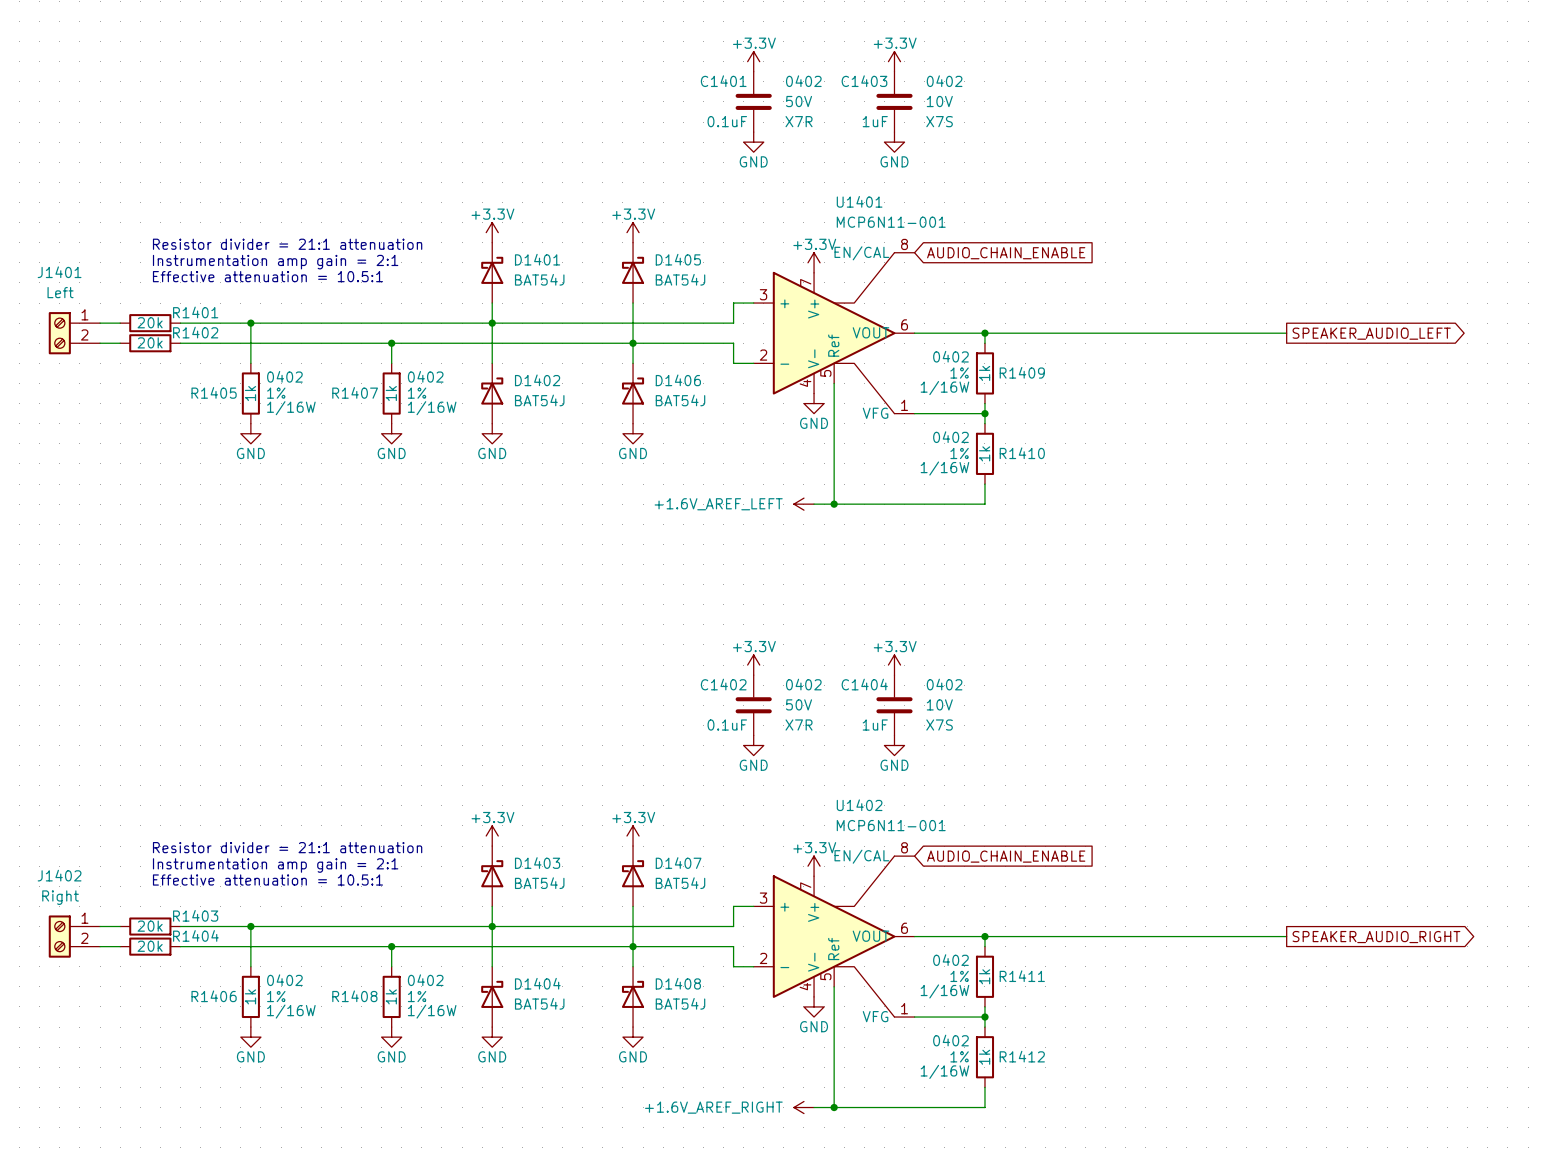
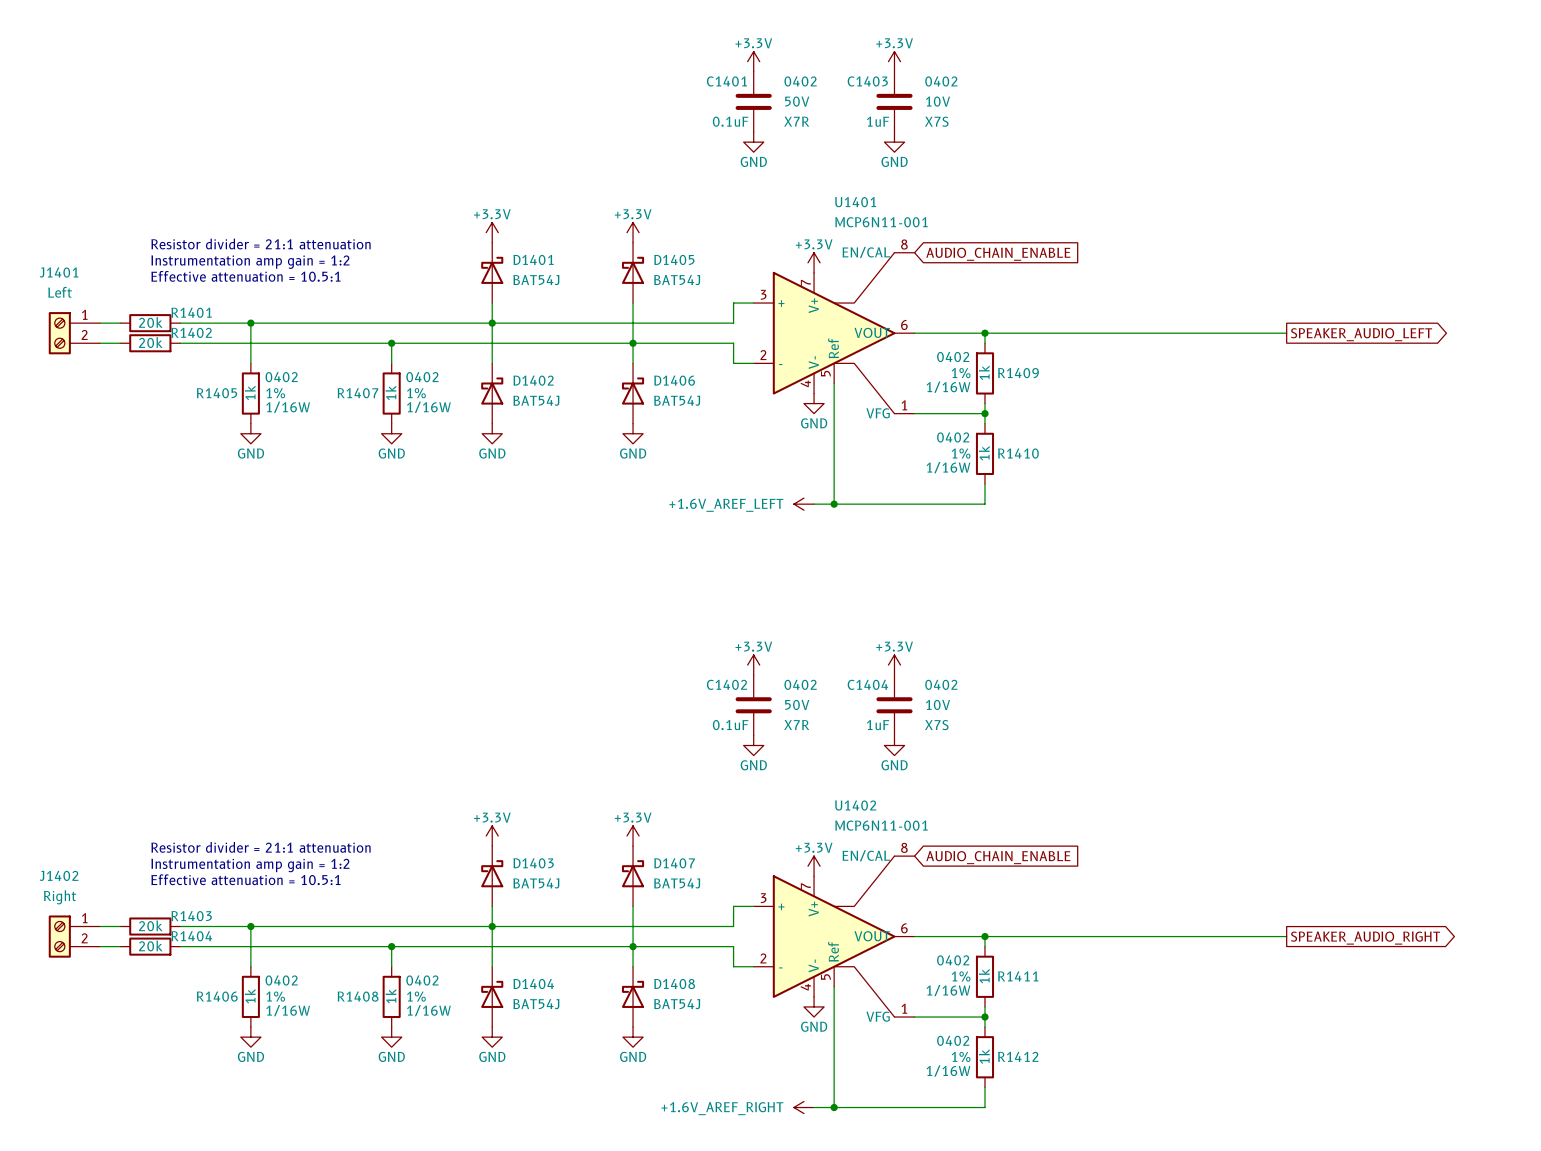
text: Instrumentation amp gain = 2:1 (275, 262) -> Instrumentation amp gain = 1:2 (250, 262)
text: Instrumentation amp gain = 2:1 (275, 865) -> Instrumentation amp gain = 1:2 (250, 865)

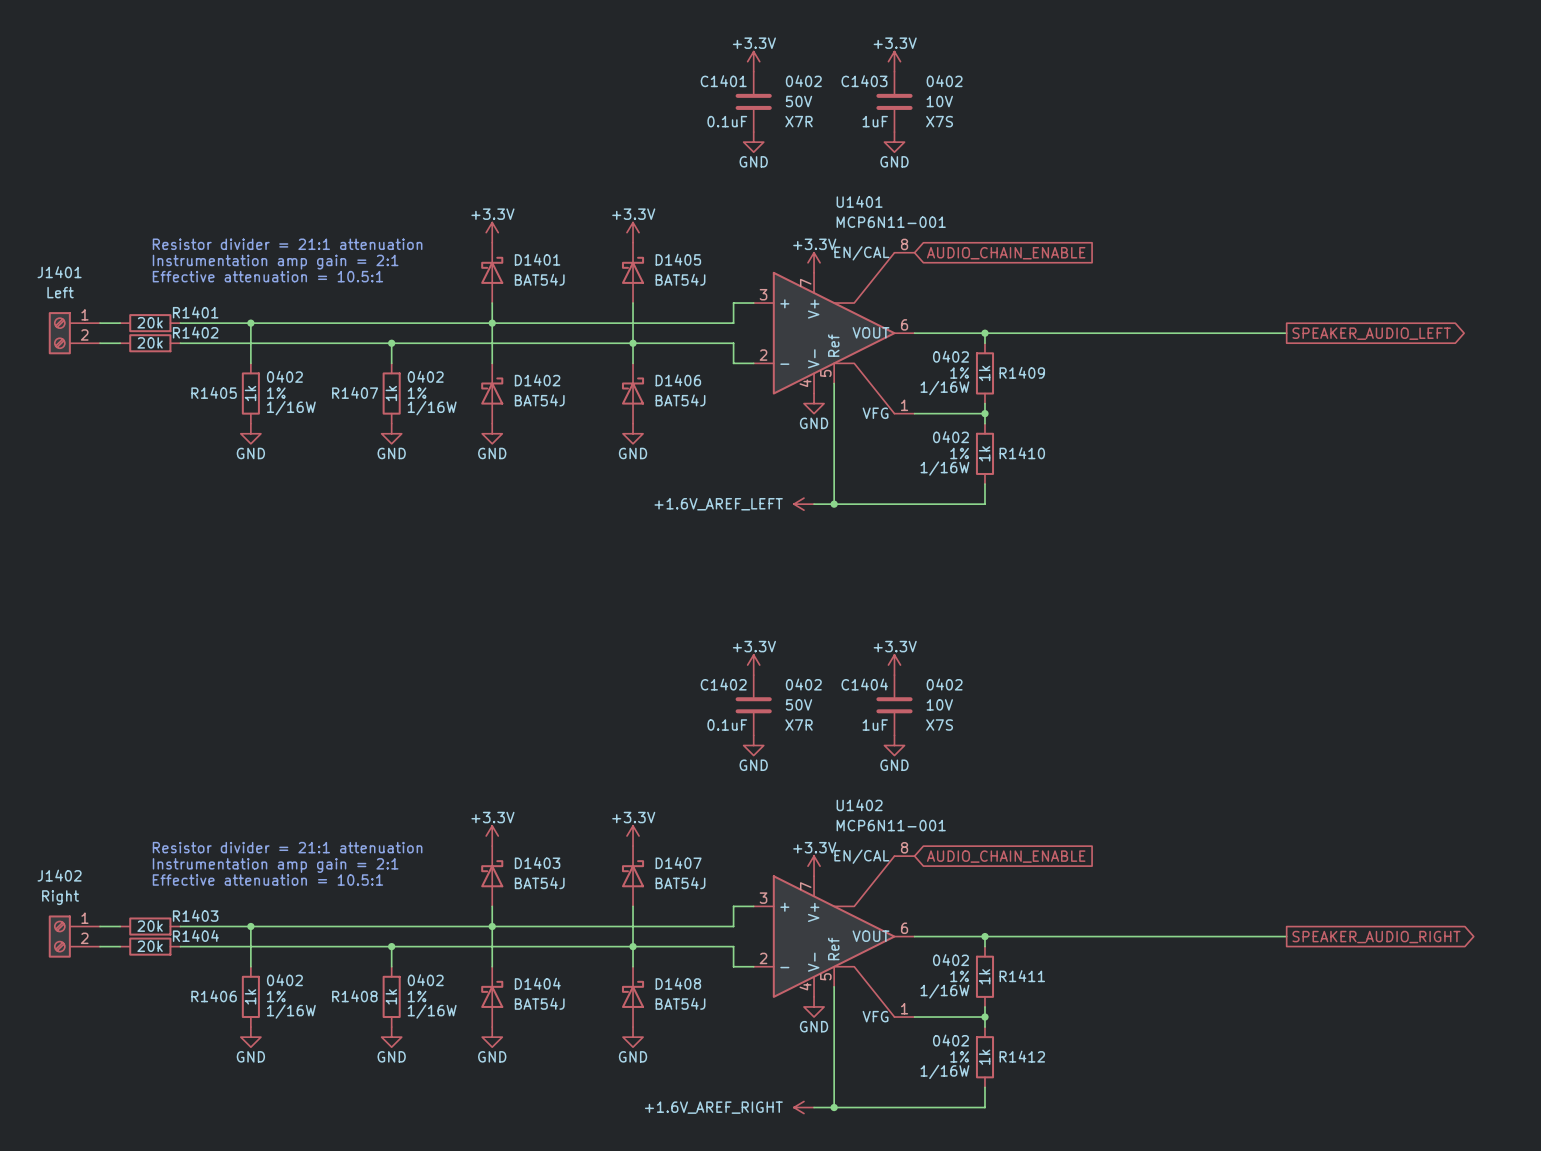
text: Instrumentation amp gain = 1:2 (250, 262) -> Instrumentation amp gain = 2:1 (275, 262)
text: Instrumentation amp gain = 1:2 (250, 865) -> Instrumentation amp gain = 2:1 (275, 865)

